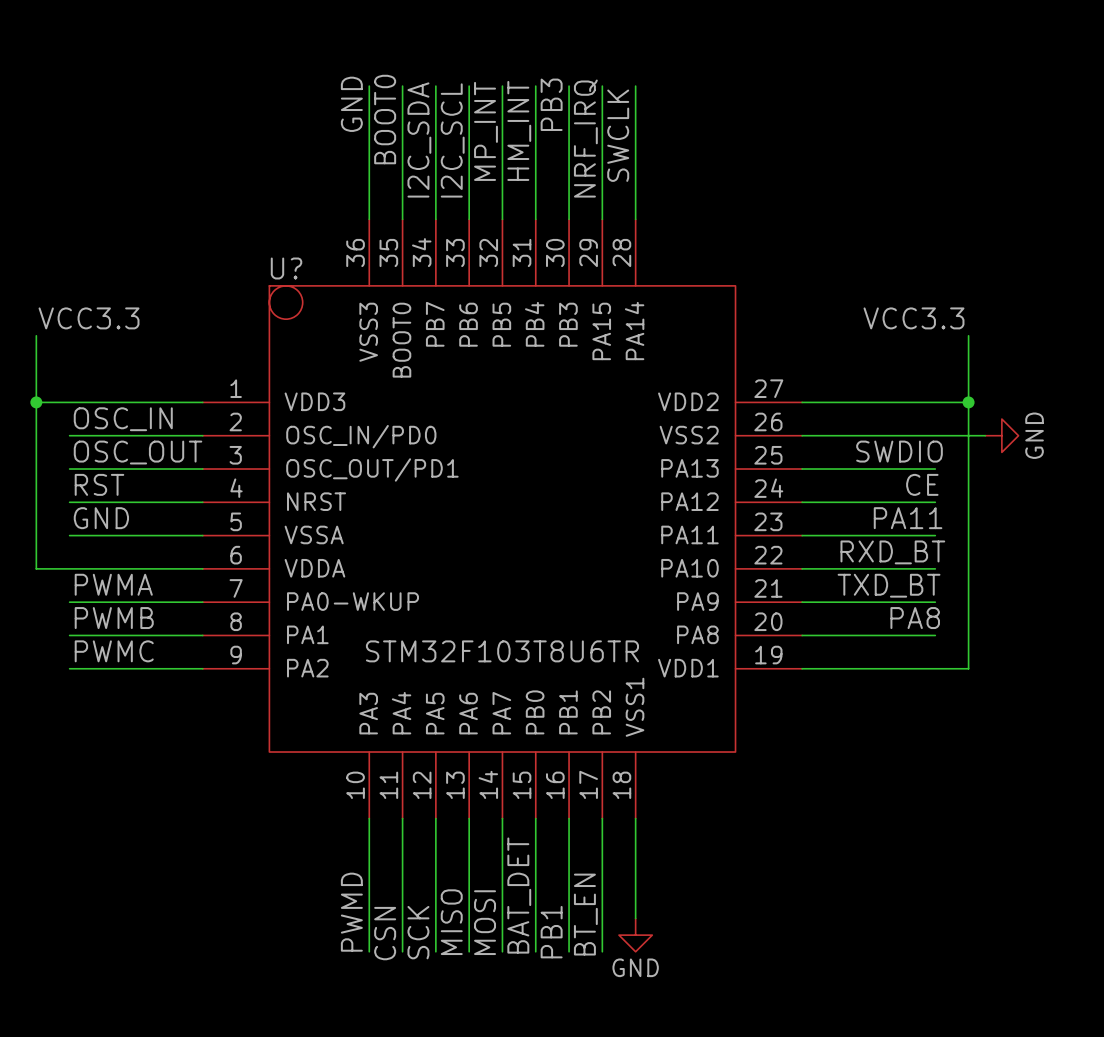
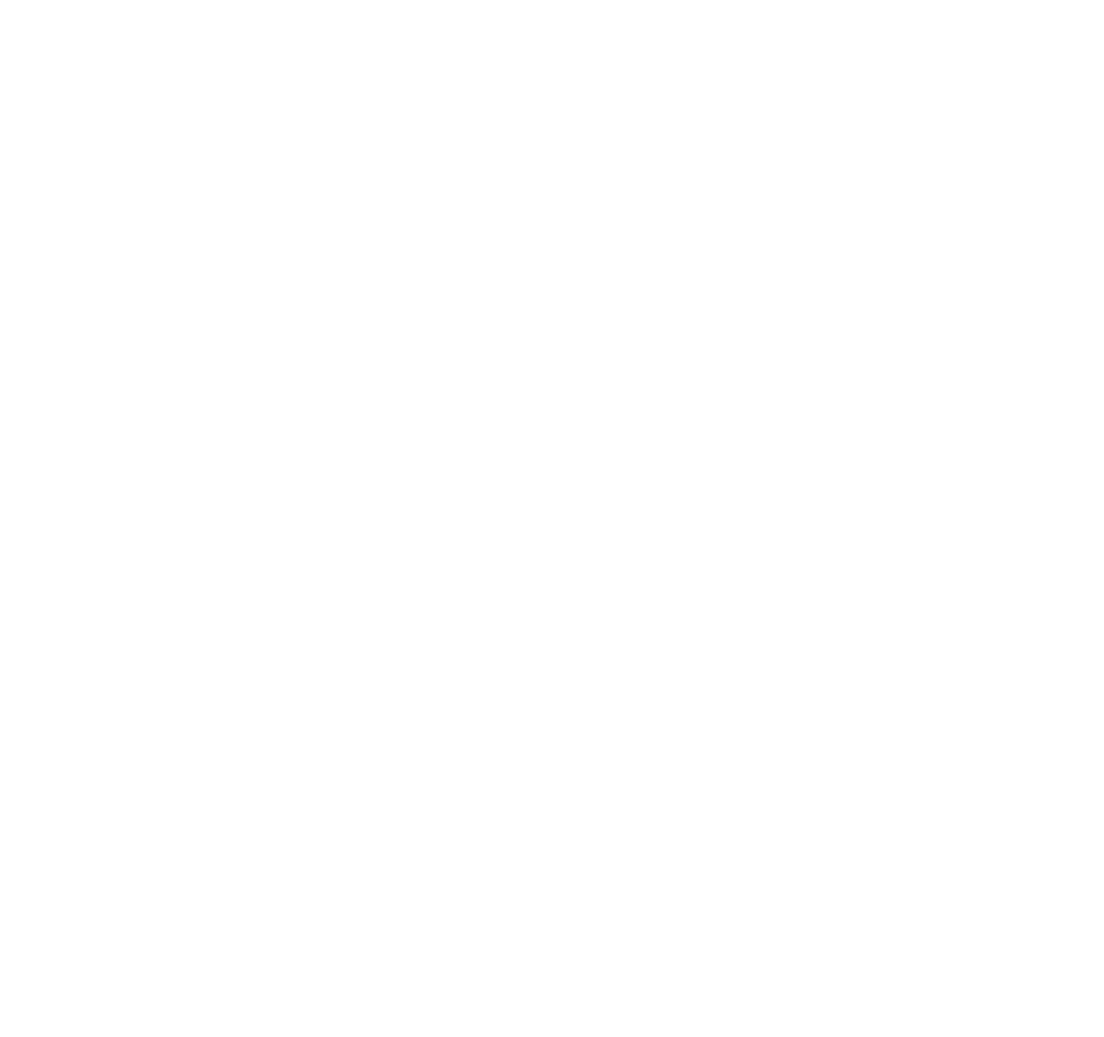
wire: (369, 86) (369, 219) -> none
wire: (402, 86) (402, 219) -> none
wire: (435, 86) (435, 219) -> none
wire: (469, 86) (469, 219) -> none
wire: (502, 86) (502, 219) -> none
wire: (535, 86) (535, 219) -> none
wire: (569, 86) (569, 219) -> none
wire: (602, 86) (602, 219) -> none
wire: (635, 86) (635, 219) -> none
label: GND (351, 104) -> none
label: PB3 (551, 104) -> none
label: BOOT0 (385, 119) -> none
label: HM_INT (519, 130) -> none
label: MP_INT (485, 131) -> none
label: SWCLK (618, 135) -> none
label: NRF_IRQ (585, 138) -> none
label: I2C_SDA (419, 139) -> none
label: I2C_SCL (452, 140) -> none
label: VCC3.3 (89, 318) -> none
label: VCC3.3 (913, 318) -> none
wire: (36, 335) (36, 568) (202, 568) -> none
wire: (968, 335) (968, 668) (802, 668) -> none
wire: (36, 402) (202, 402) -> none
junction: (36, 402) -> none
wire: (802, 402) (968, 402) -> none
junction: (968, 402) -> none
label: OSC_IN (123, 419) -> none
wire: (69, 435) (202, 435) -> none
wire: (802, 435) (985, 435) -> none
power symbol: GND (1001, 435) -> none
label: SWDIO (899, 451) -> none
label: OSC_OUT (138, 452) -> none
wire: (69, 469) (202, 469) -> none
wire: (802, 469) (935, 469) -> none
label: RST (99, 484) -> none
label: CE (922, 484) -> none
wire: (69, 502) (202, 502) -> none
wire: (802, 502) (935, 502) -> none
label: GND (101, 518) -> none
label: PA11 (908, 518) -> none
wire: (69, 535) (202, 535) -> none
U?: STM32F103T8U6TR (519, 535) -> none
wire: (802, 535) (935, 535) -> none
label: RXD_BT (892, 552) -> none
wire: (802, 568) (935, 568) -> none
label: PWMA (113, 584) -> none
label: TXD_BT (889, 585) -> none
wire: (69, 602) (202, 602) -> none
wire: (802, 602) (935, 602) -> none
label: PWMB (114, 618) -> none
label: PA8 (915, 618) -> none
wire: (69, 635) (202, 635) -> none
wire: (802, 635) (935, 635) -> none
label: PWMC (114, 651) -> none
wire: (69, 668) (202, 668) -> none
wire: (369, 818) (369, 951) -> none
wire: (402, 818) (402, 951) -> none
wire: (435, 818) (435, 951) -> none
wire: (469, 818) (469, 951) -> none
wire: (502, 818) (502, 951) -> none
wire: (535, 818) (535, 951) -> none
wire: (569, 818) (569, 951) -> none
wire: (602, 818) (602, 951) -> none
wire: (635, 818) (635, 918) -> none
label: BAT_DET (519, 895) -> none
label: PWMD (351, 912) -> none
label: BT_EN (585, 914) -> none
label: MISO (451, 922) -> none
label: MOSI (485, 922) -> none
label: SCK (418, 932) -> none
label: PB1 (551, 932) -> none
label: CSN (385, 933) -> none
power symbol: GND (635, 935) -> none

